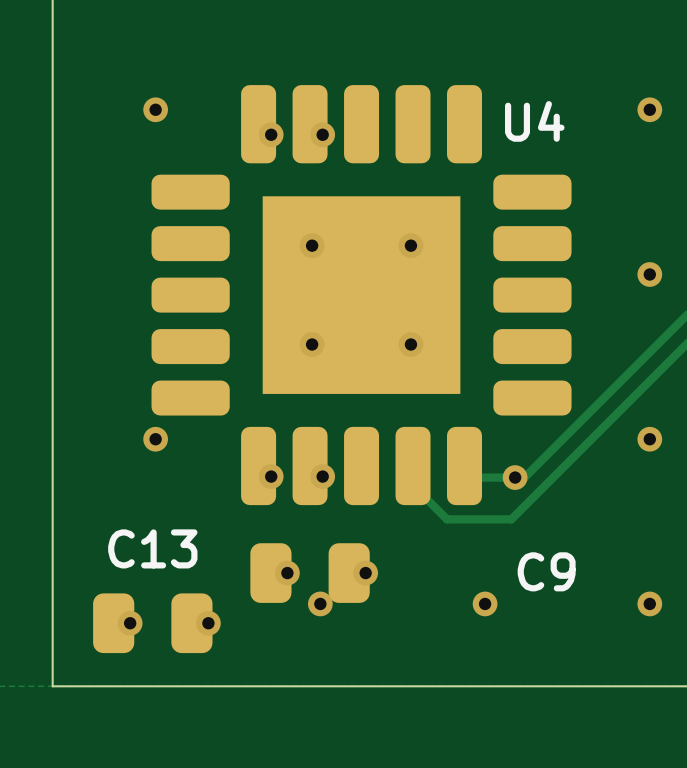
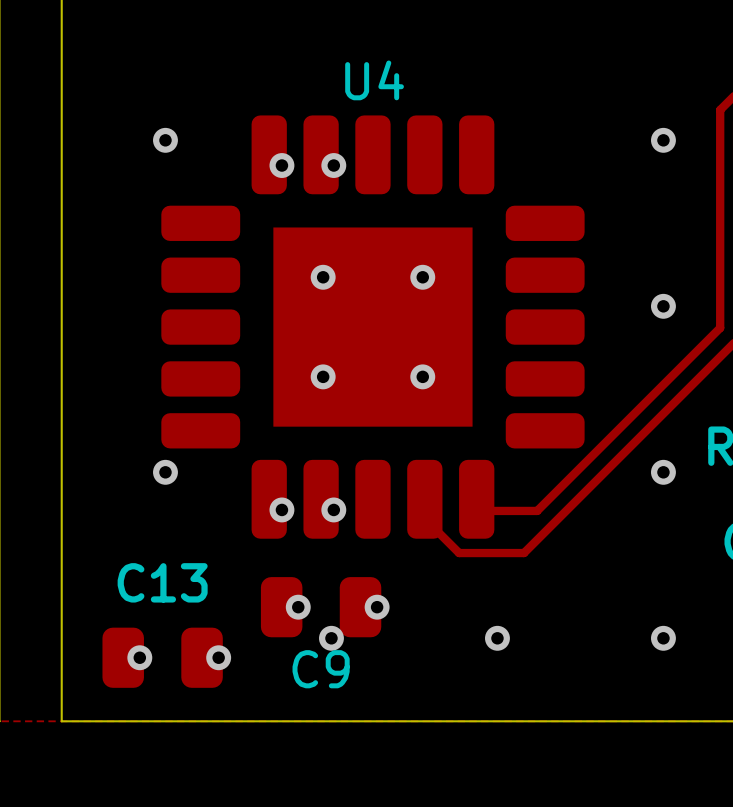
U4 name position: U4 (534, 121) -> U4 (374, 80)
via: (515, 477) -> none
C9 name position: C9 (546, 571) -> C9 (321, 669)

